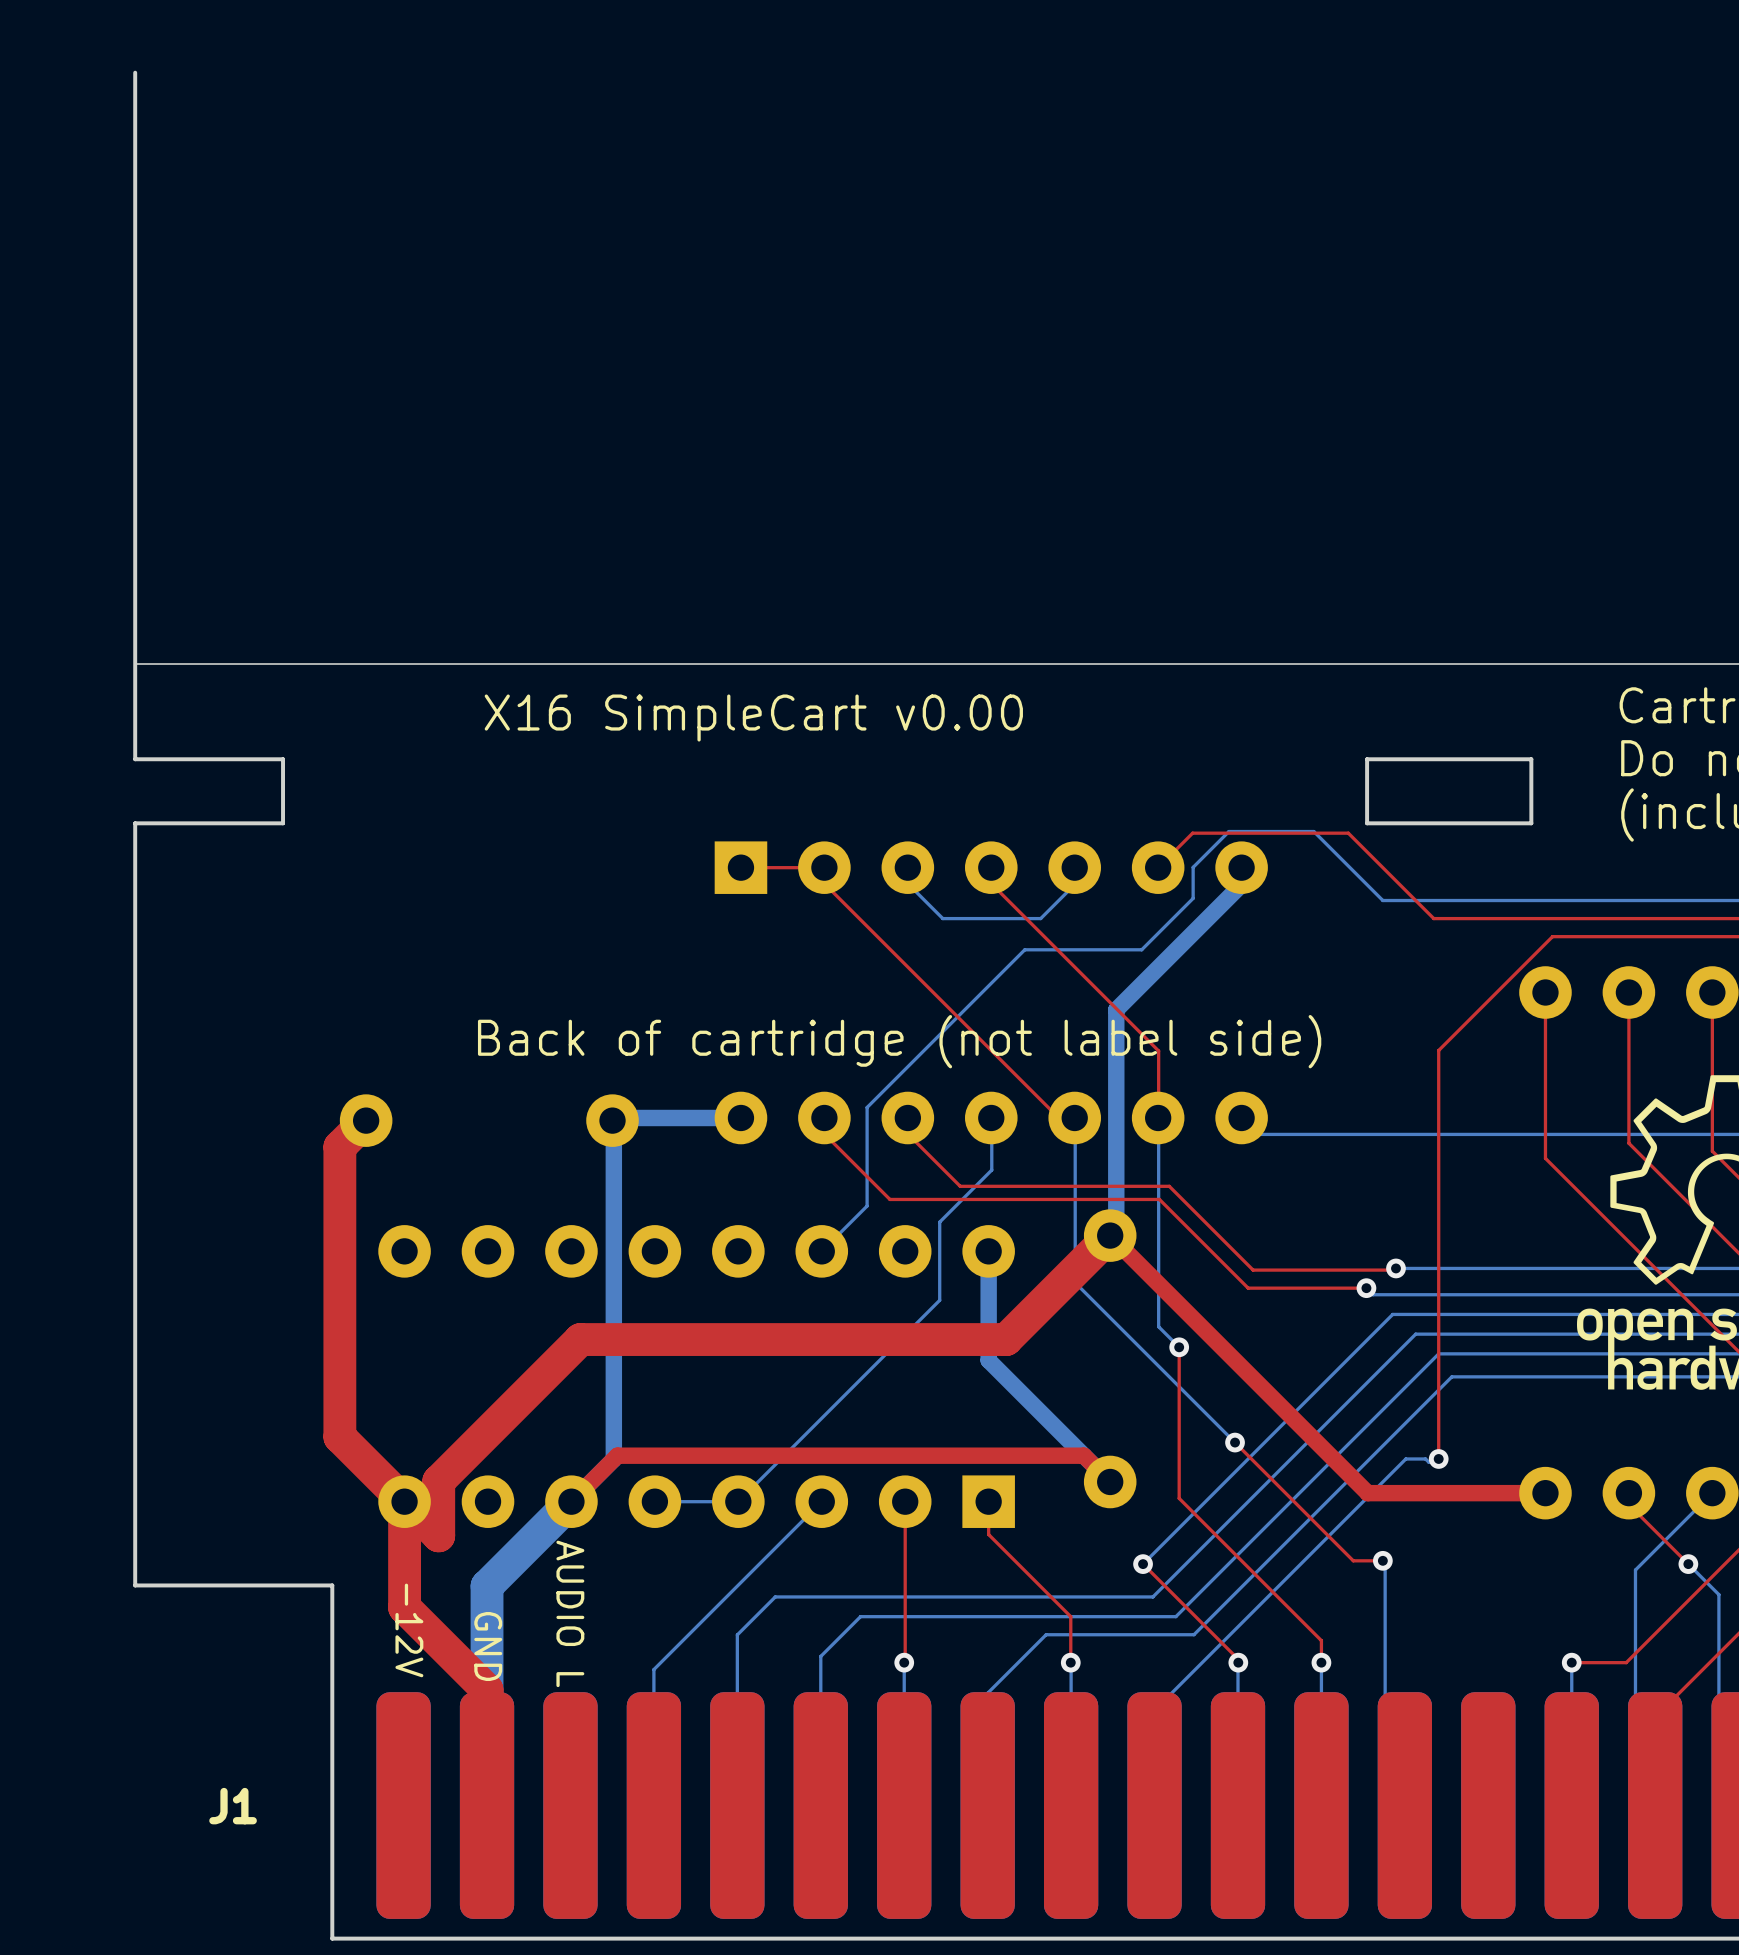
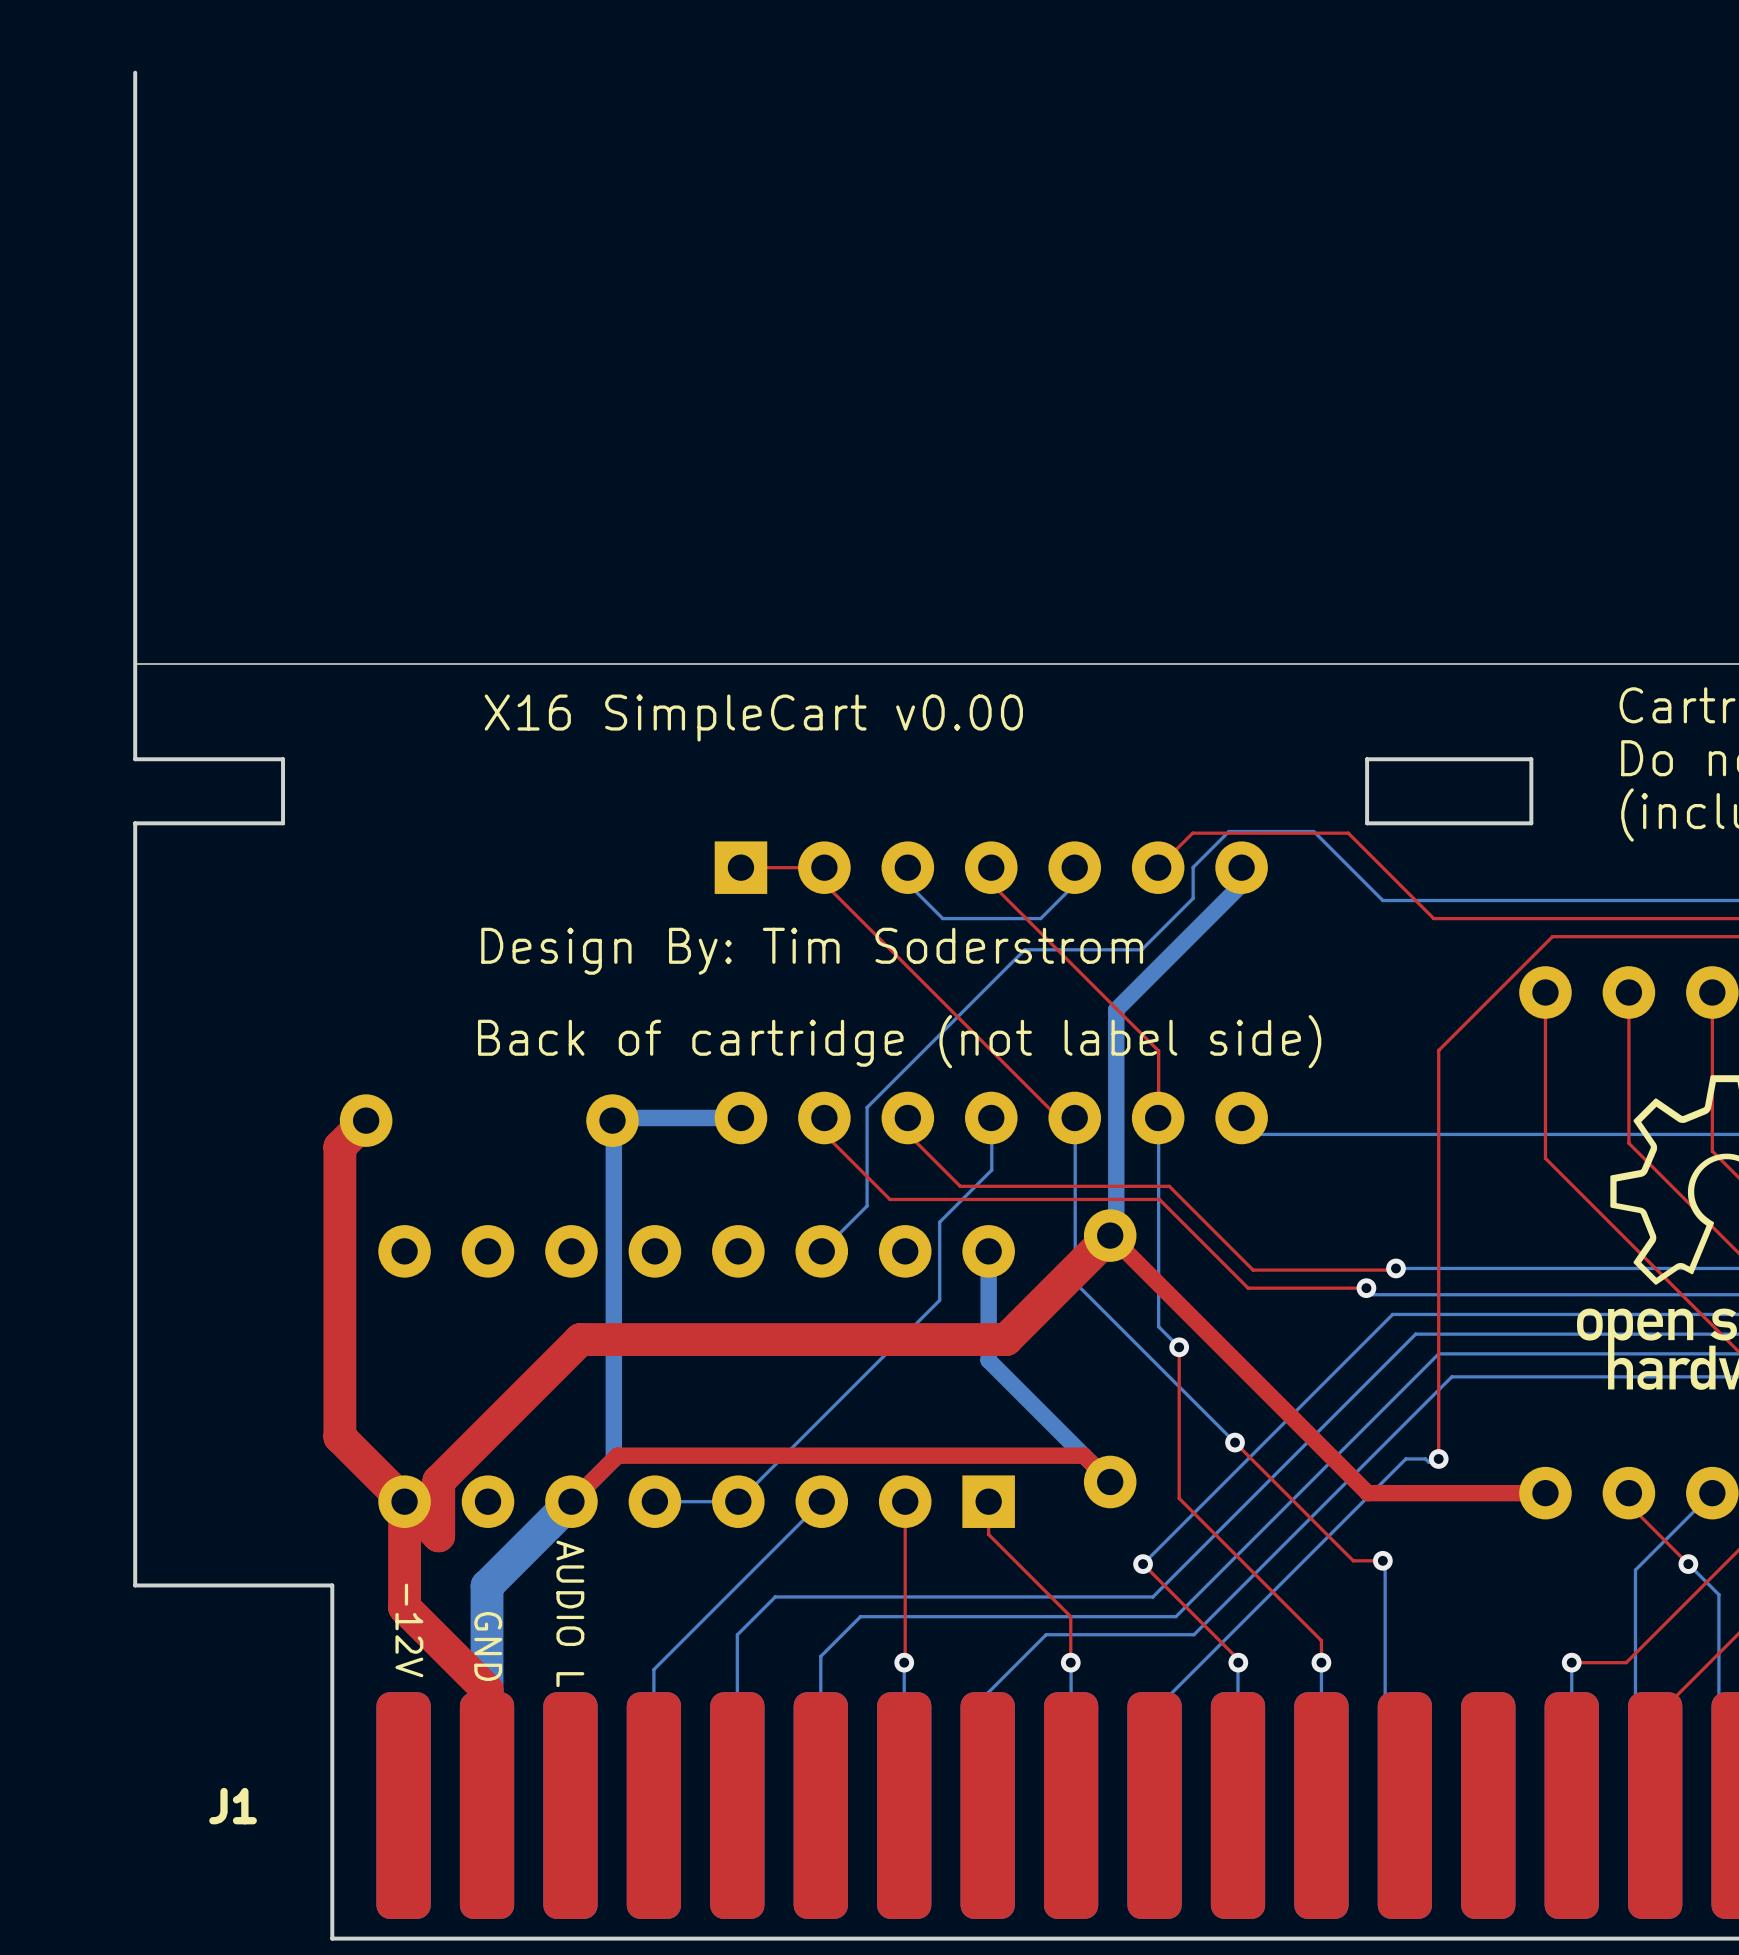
text: none -> Design By: Tim Soderstrom (812, 951)

